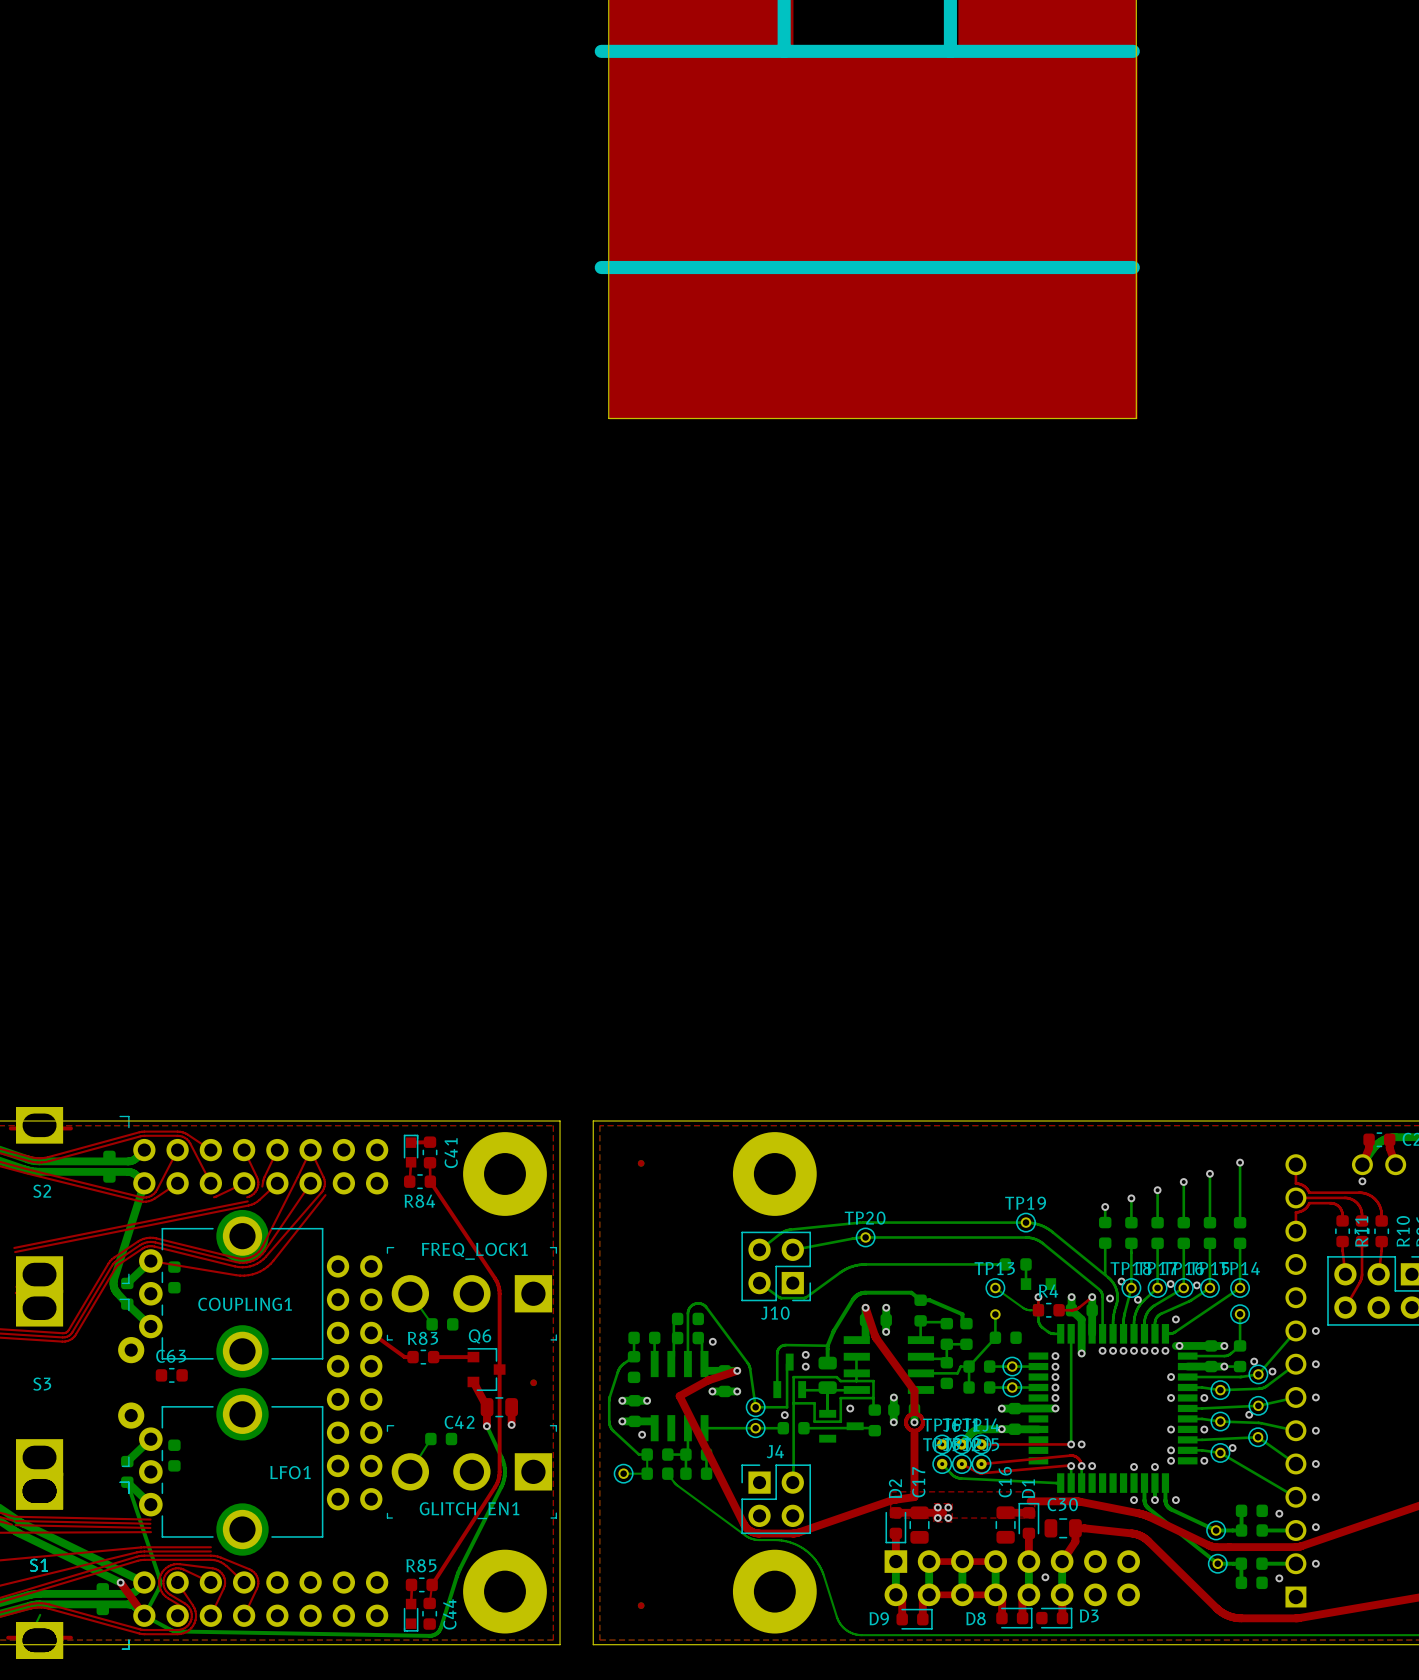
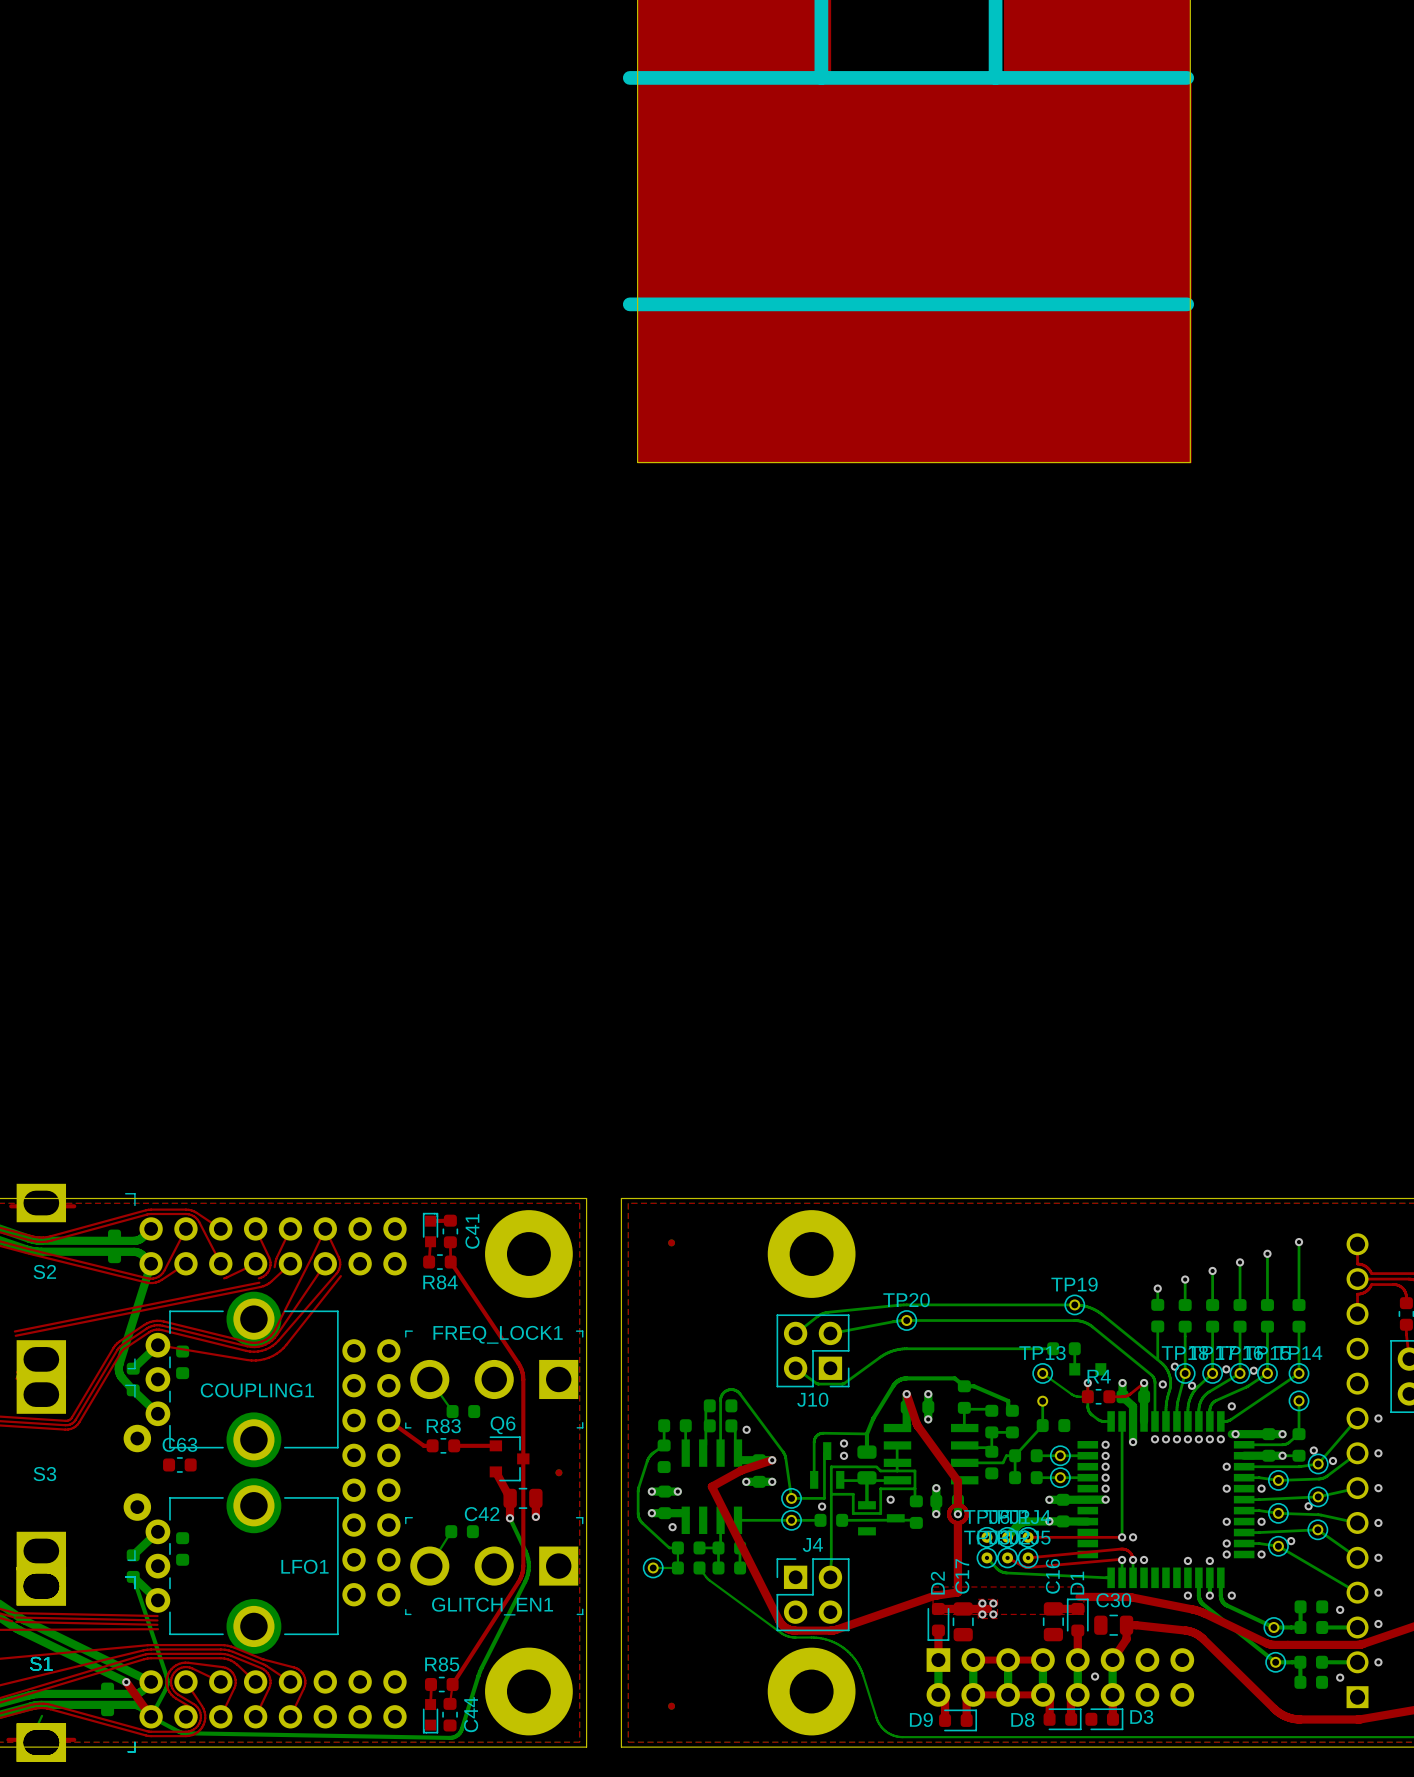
top track: none -> (220, 1645) (231, 1646) (264, 1659)
top track: none -> (220, 1649) (233, 1651) (262, 1664) (290, 1681)
top track: none -> (261, 1659) (296, 1668) (304, 1675) (304, 1685) (290, 1716)

